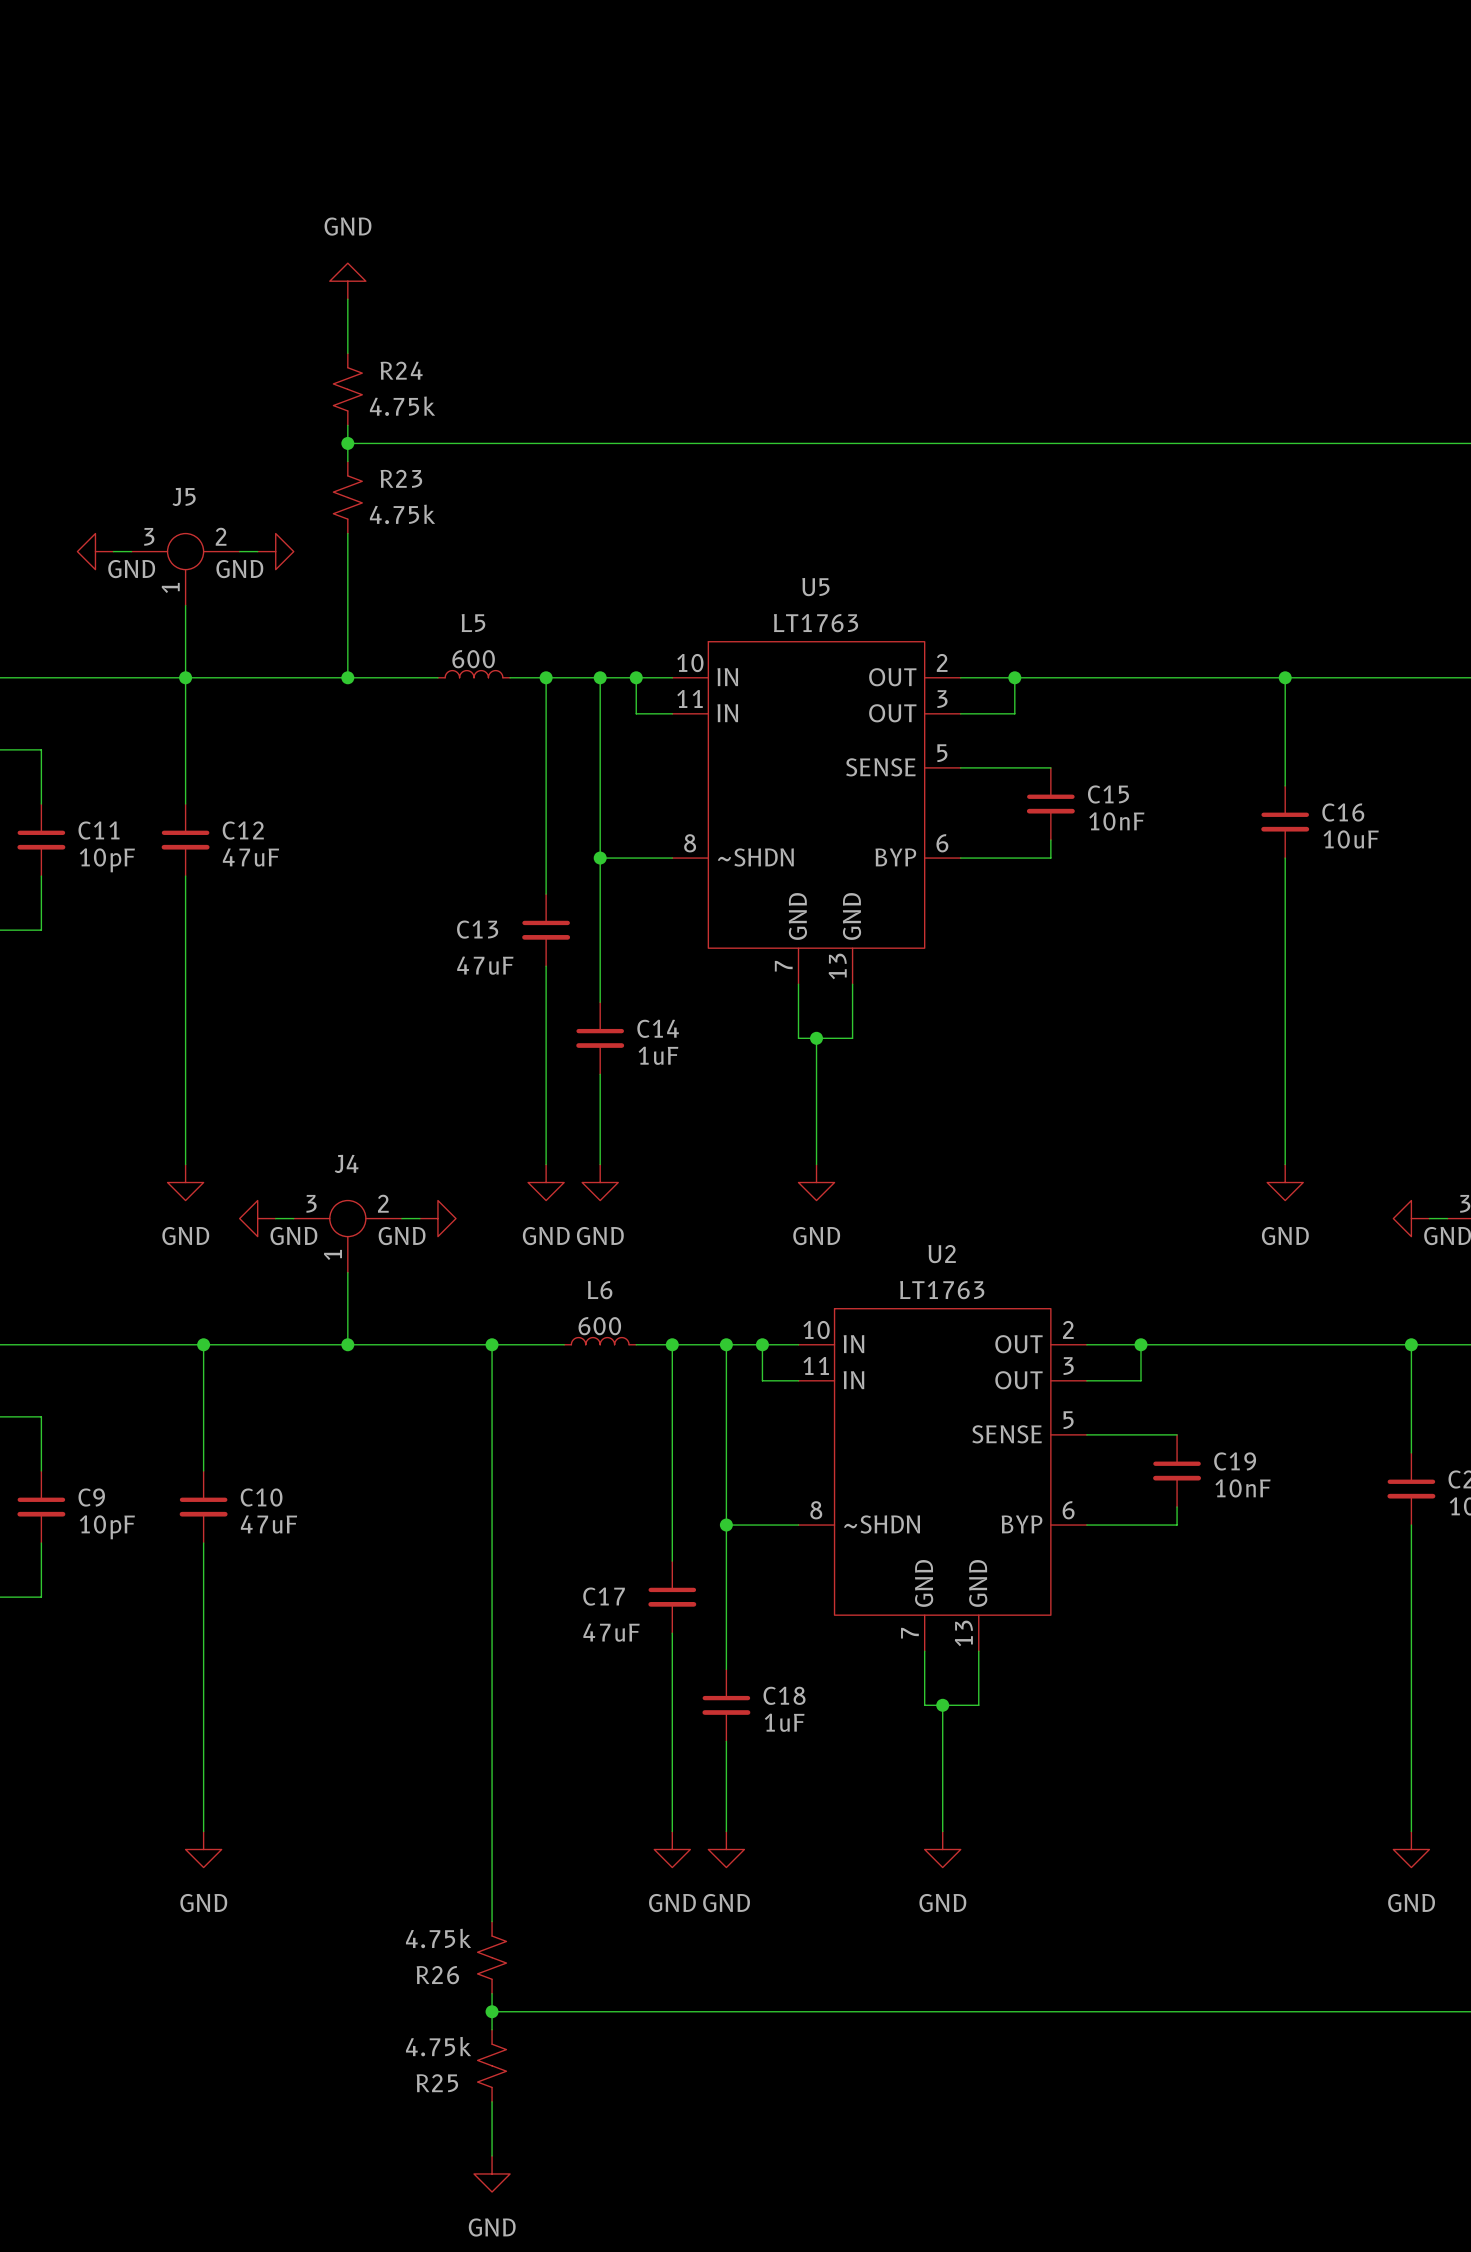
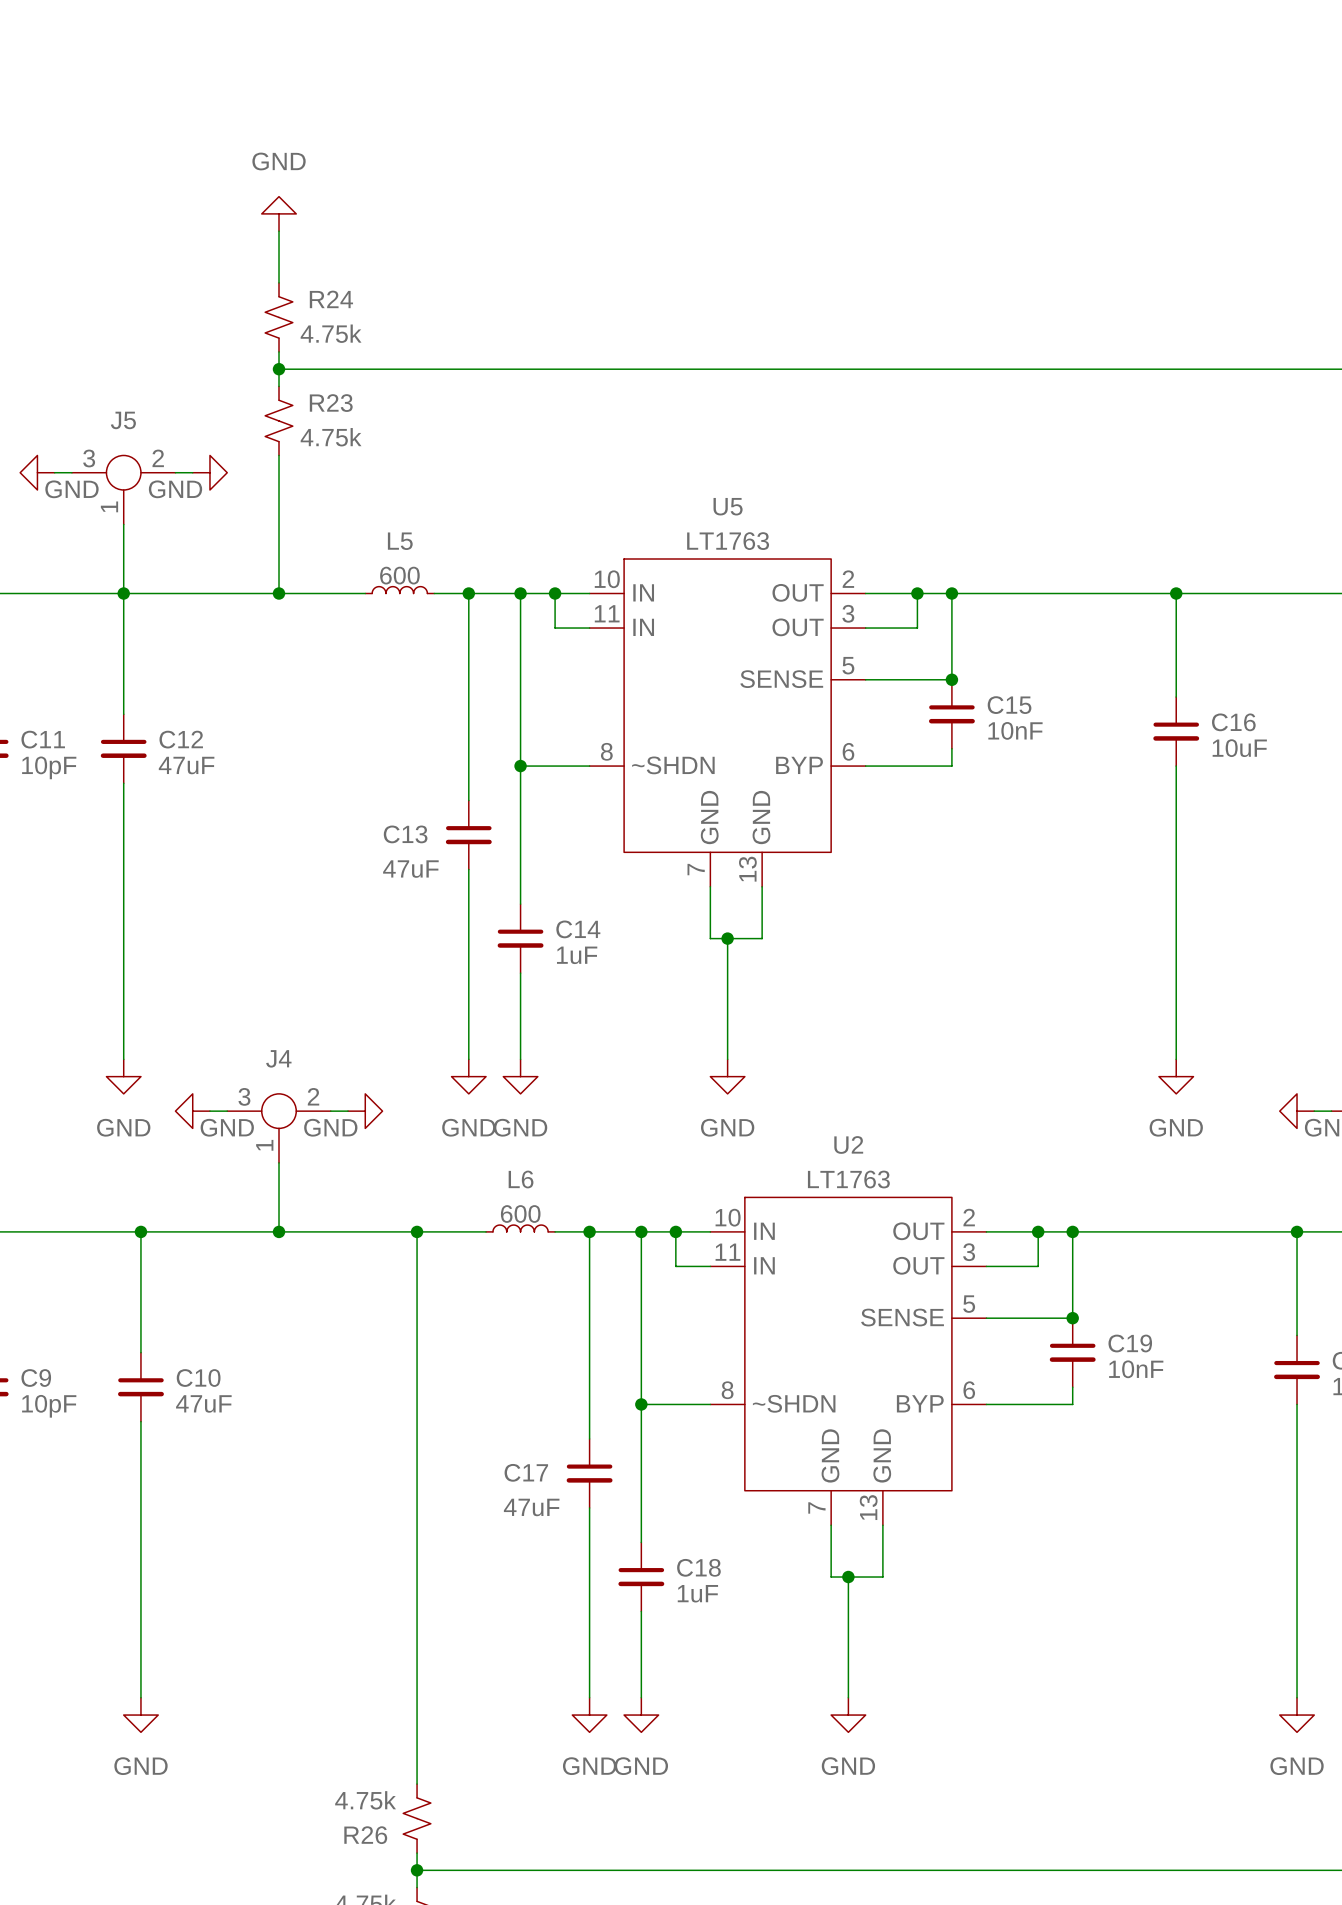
wire: none -> (951, 593) (951, 679)
junction: none -> (951, 593)
junction: none -> (951, 679)
wire: none -> (1072, 1231) (1072, 1318)
junction: none -> (1072, 1231)
junction: none -> (1072, 1318)

